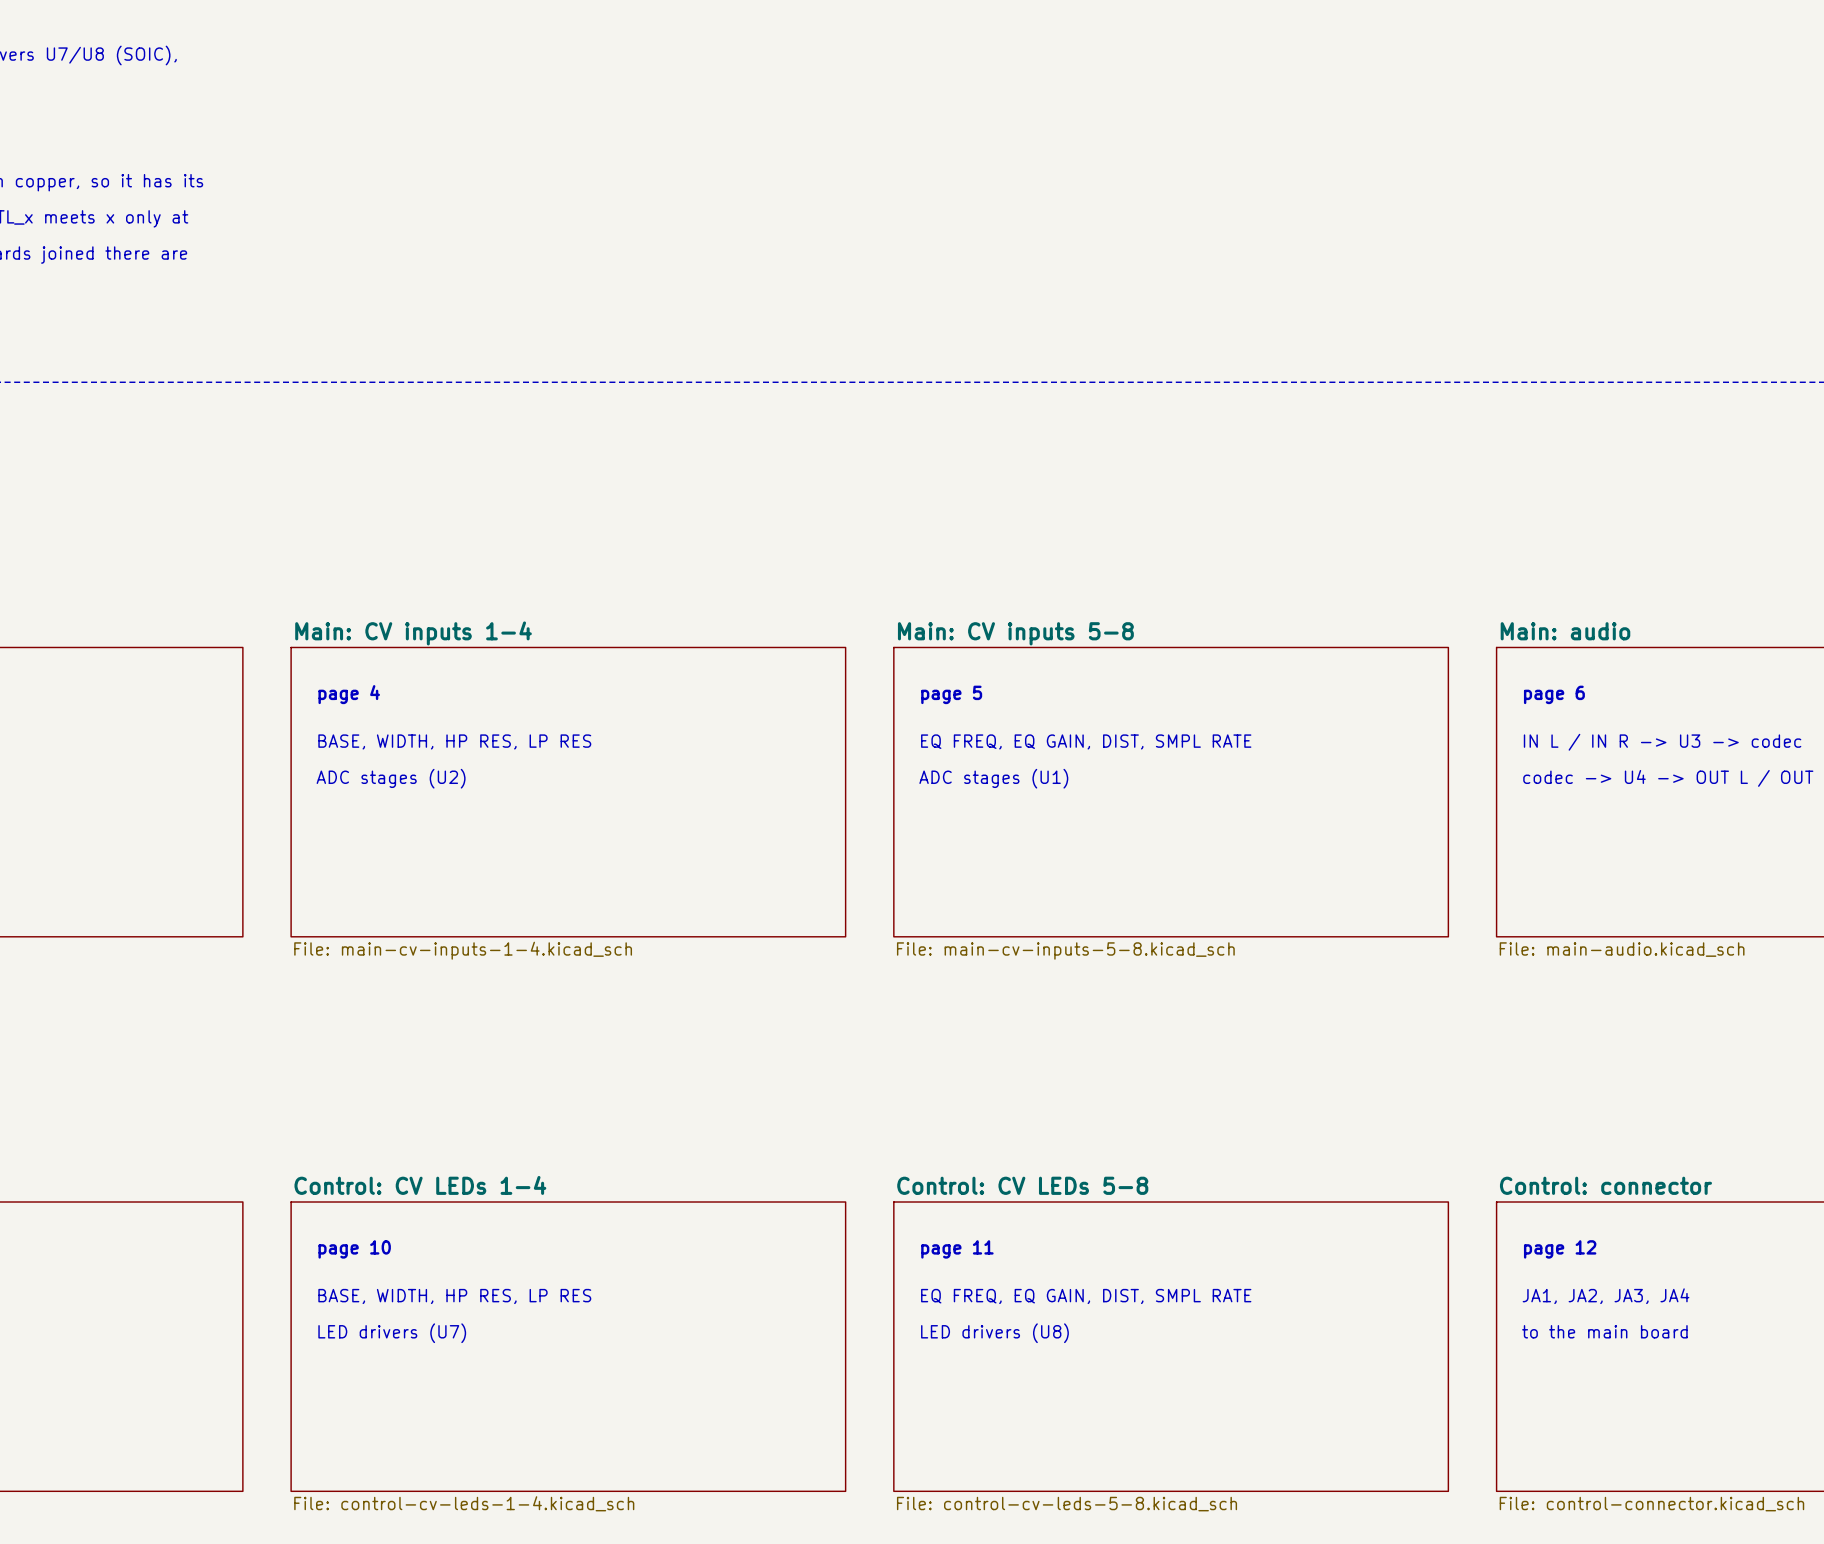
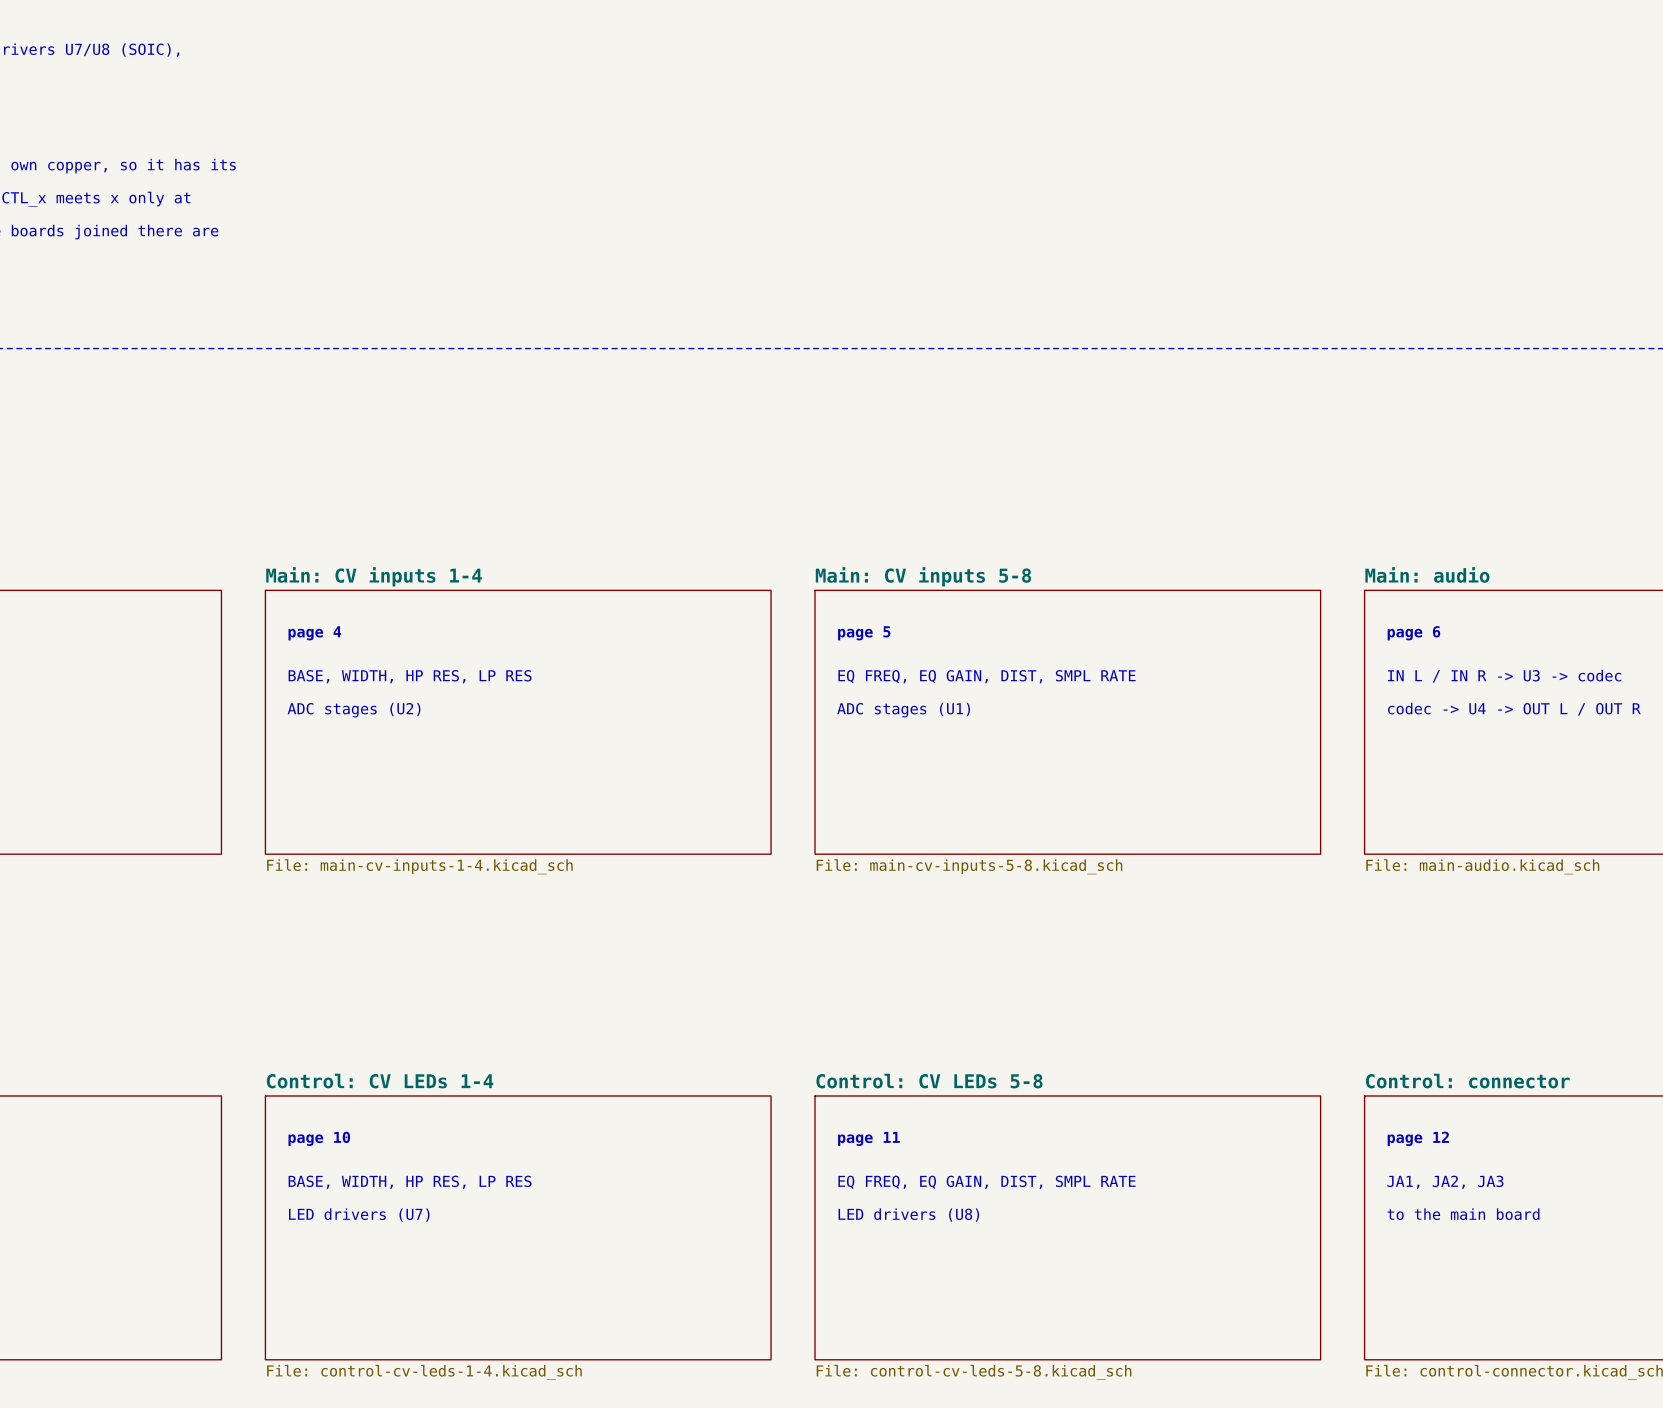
text: JA1, JA2, JA3, JA4 (1606, 1296) -> JA1, JA2, JA3 (1445, 1182)

